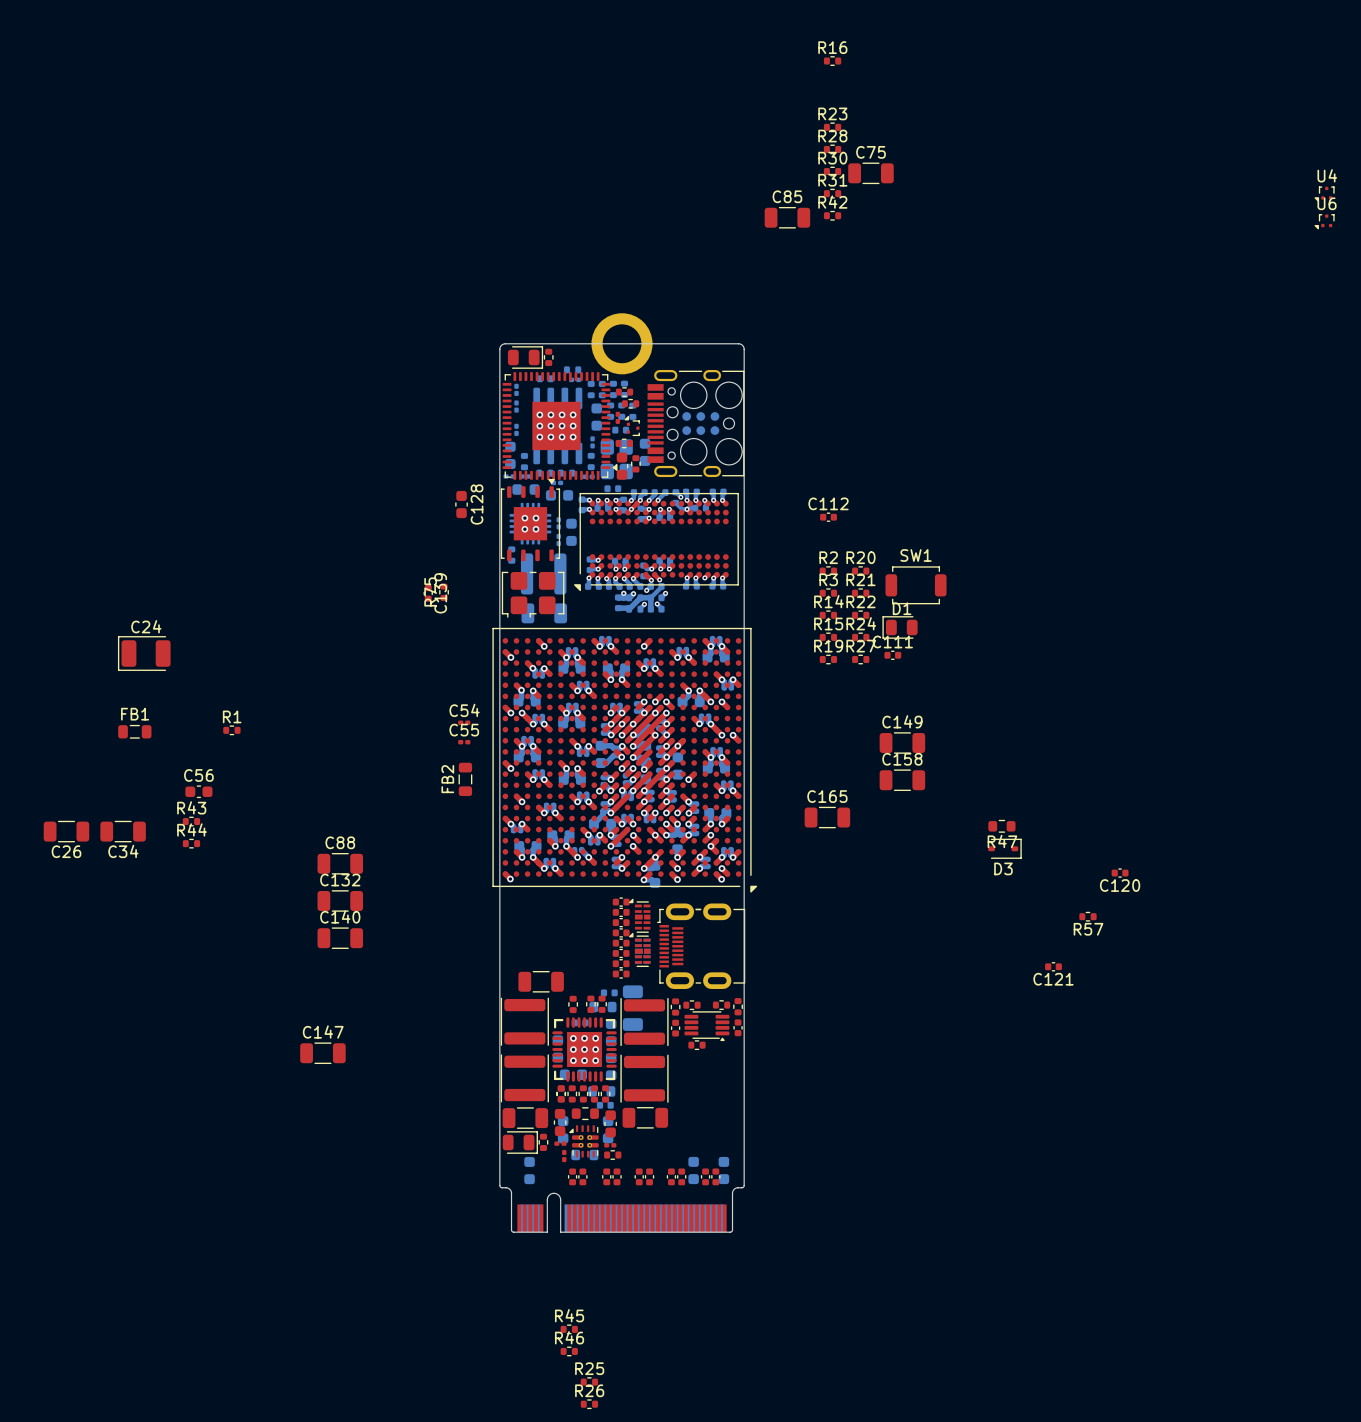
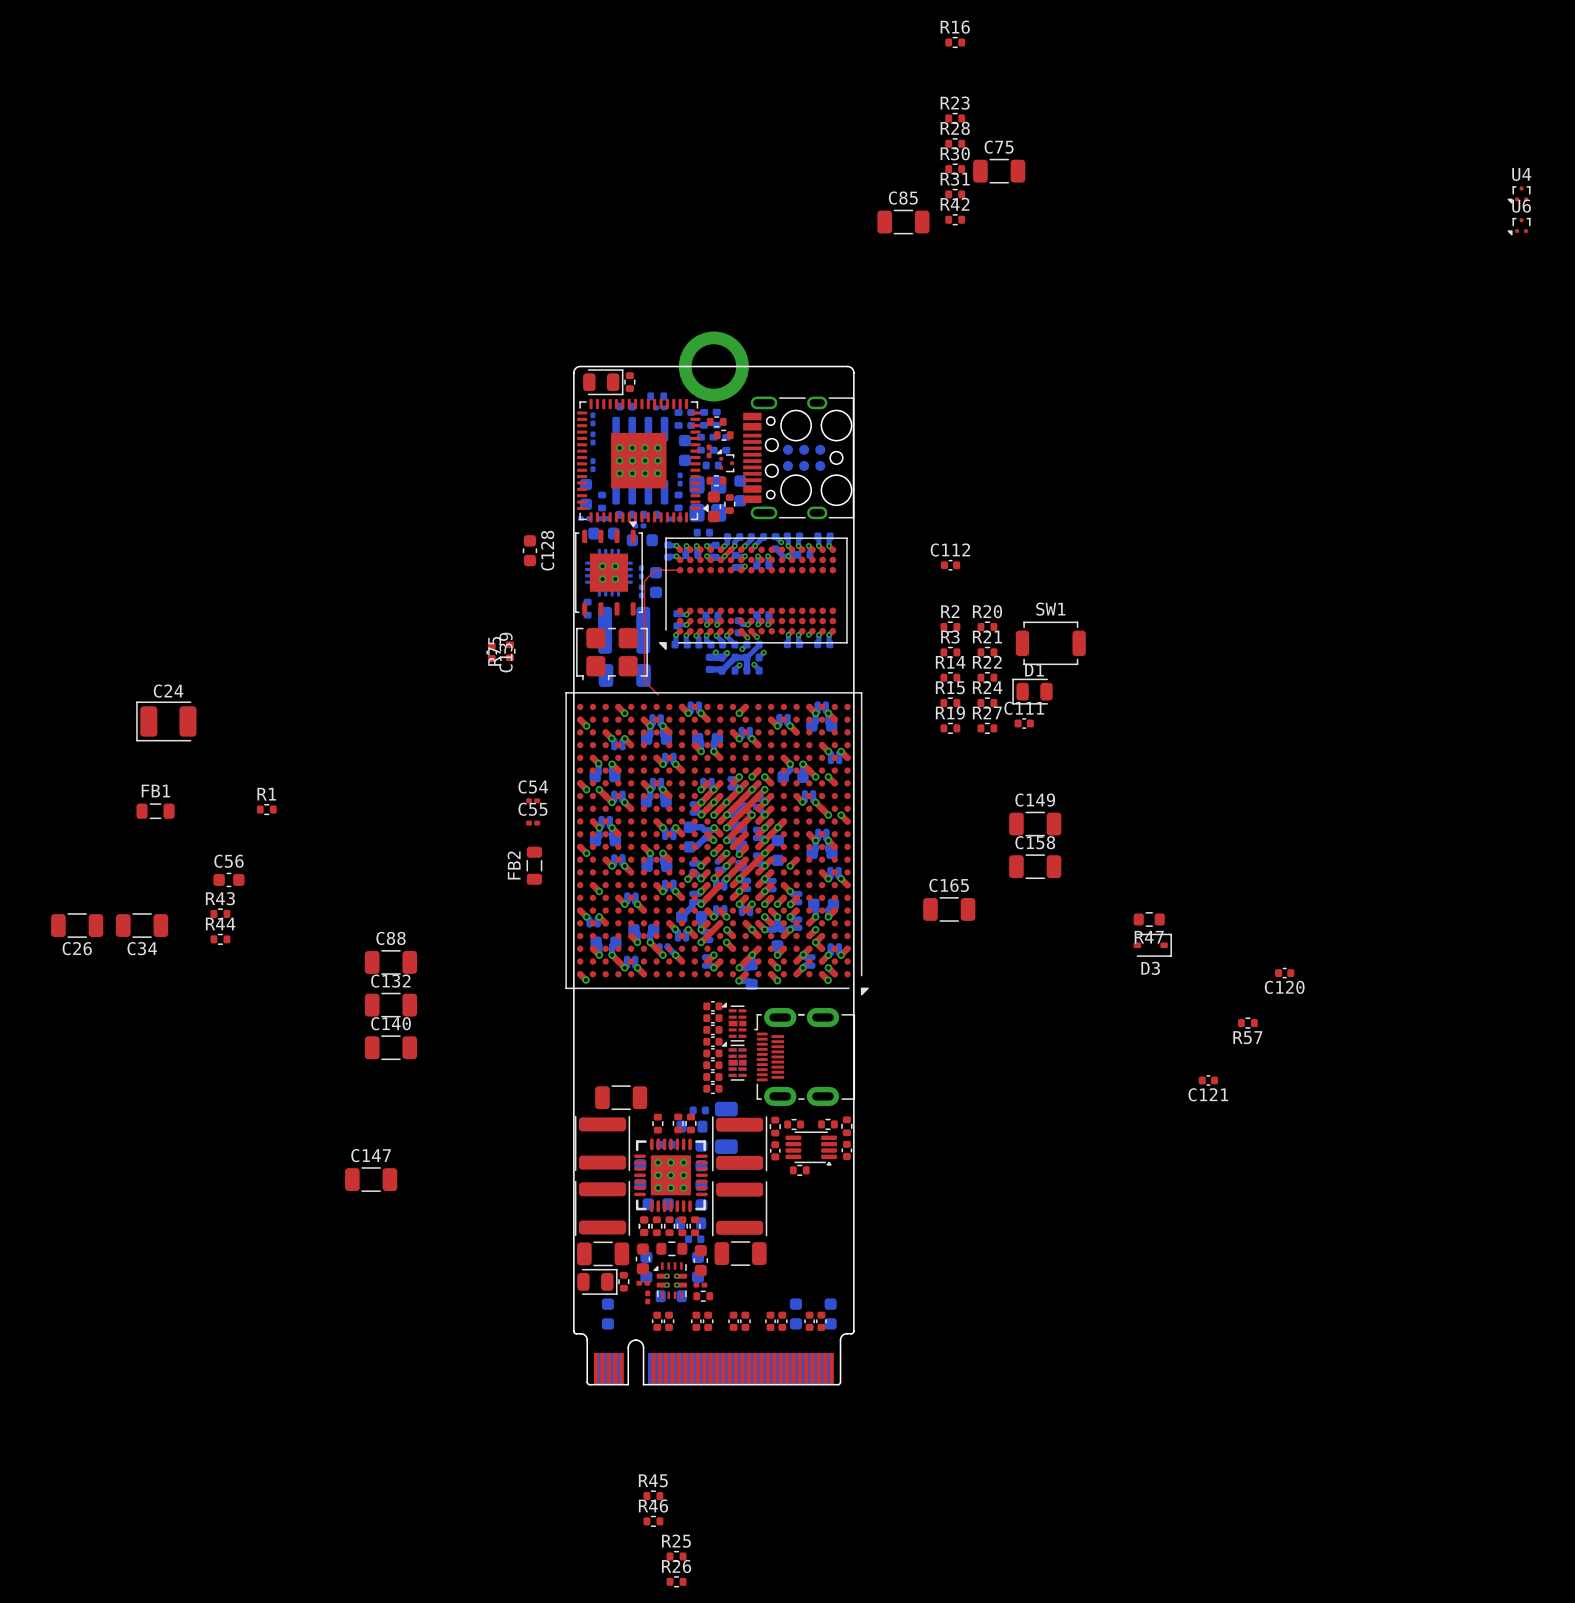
top track: none -> (680, 570) (655, 570) (644, 580) (644, 681) (658, 694)

